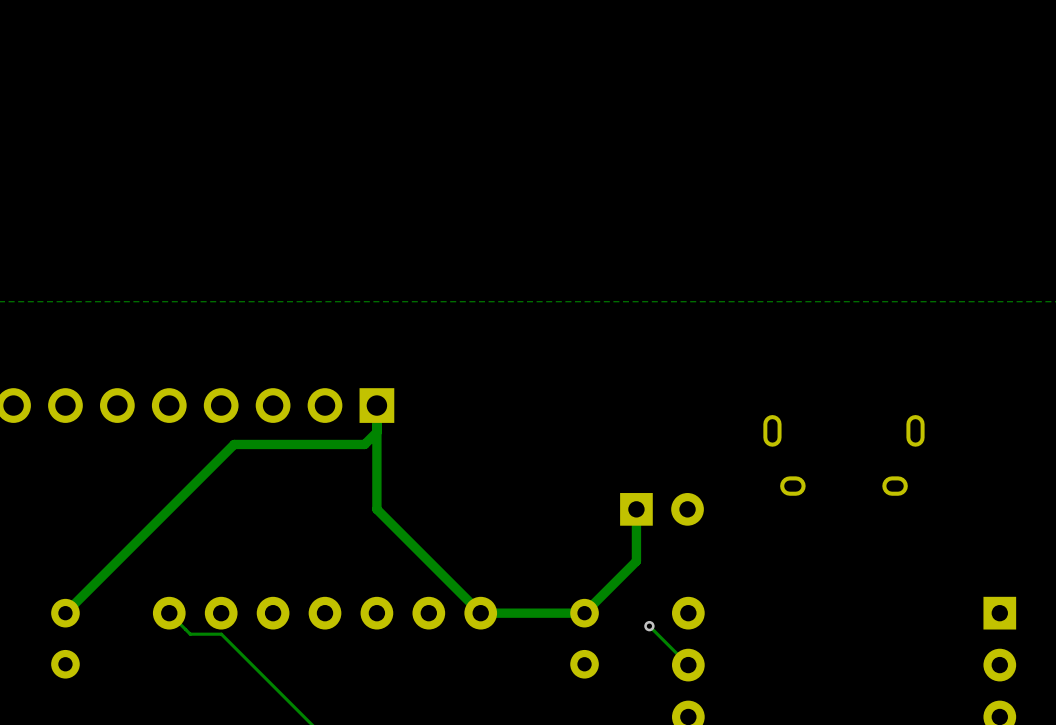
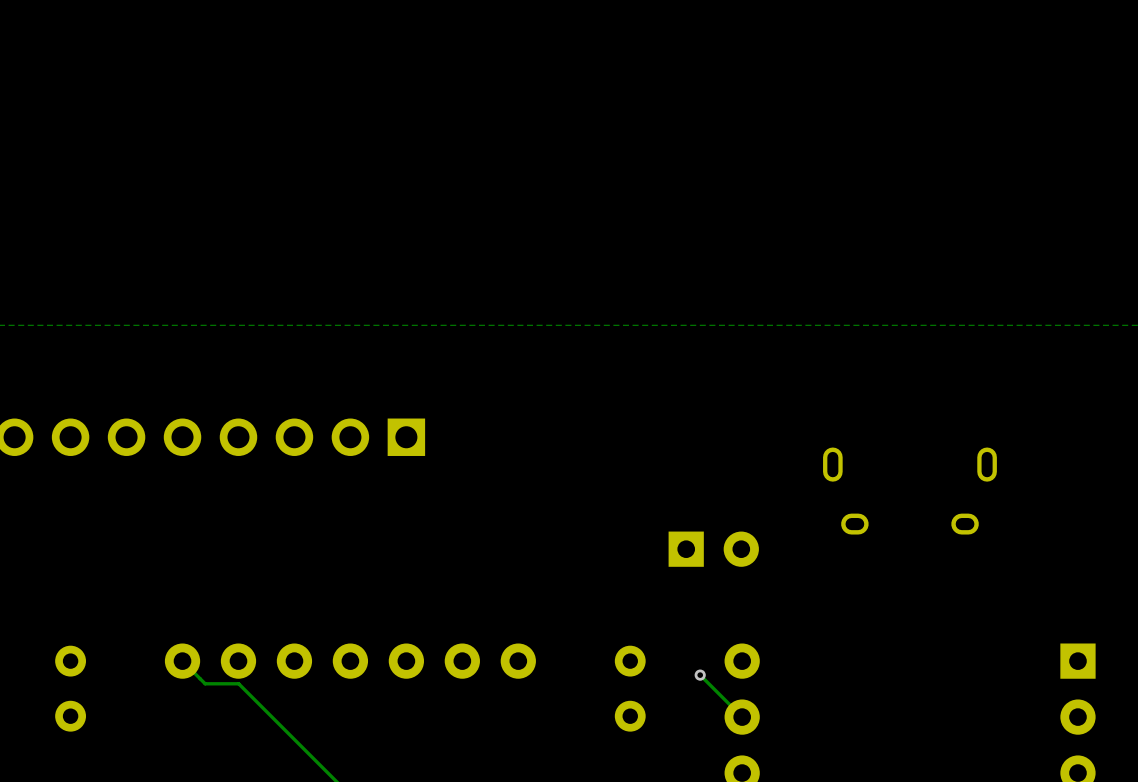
track: (376, 405) (376, 509) (480, 613) (584, 613) (636, 561) (636, 509) -> none
track: (376, 432) (364, 444) (234, 444) (65, 613) -> none

